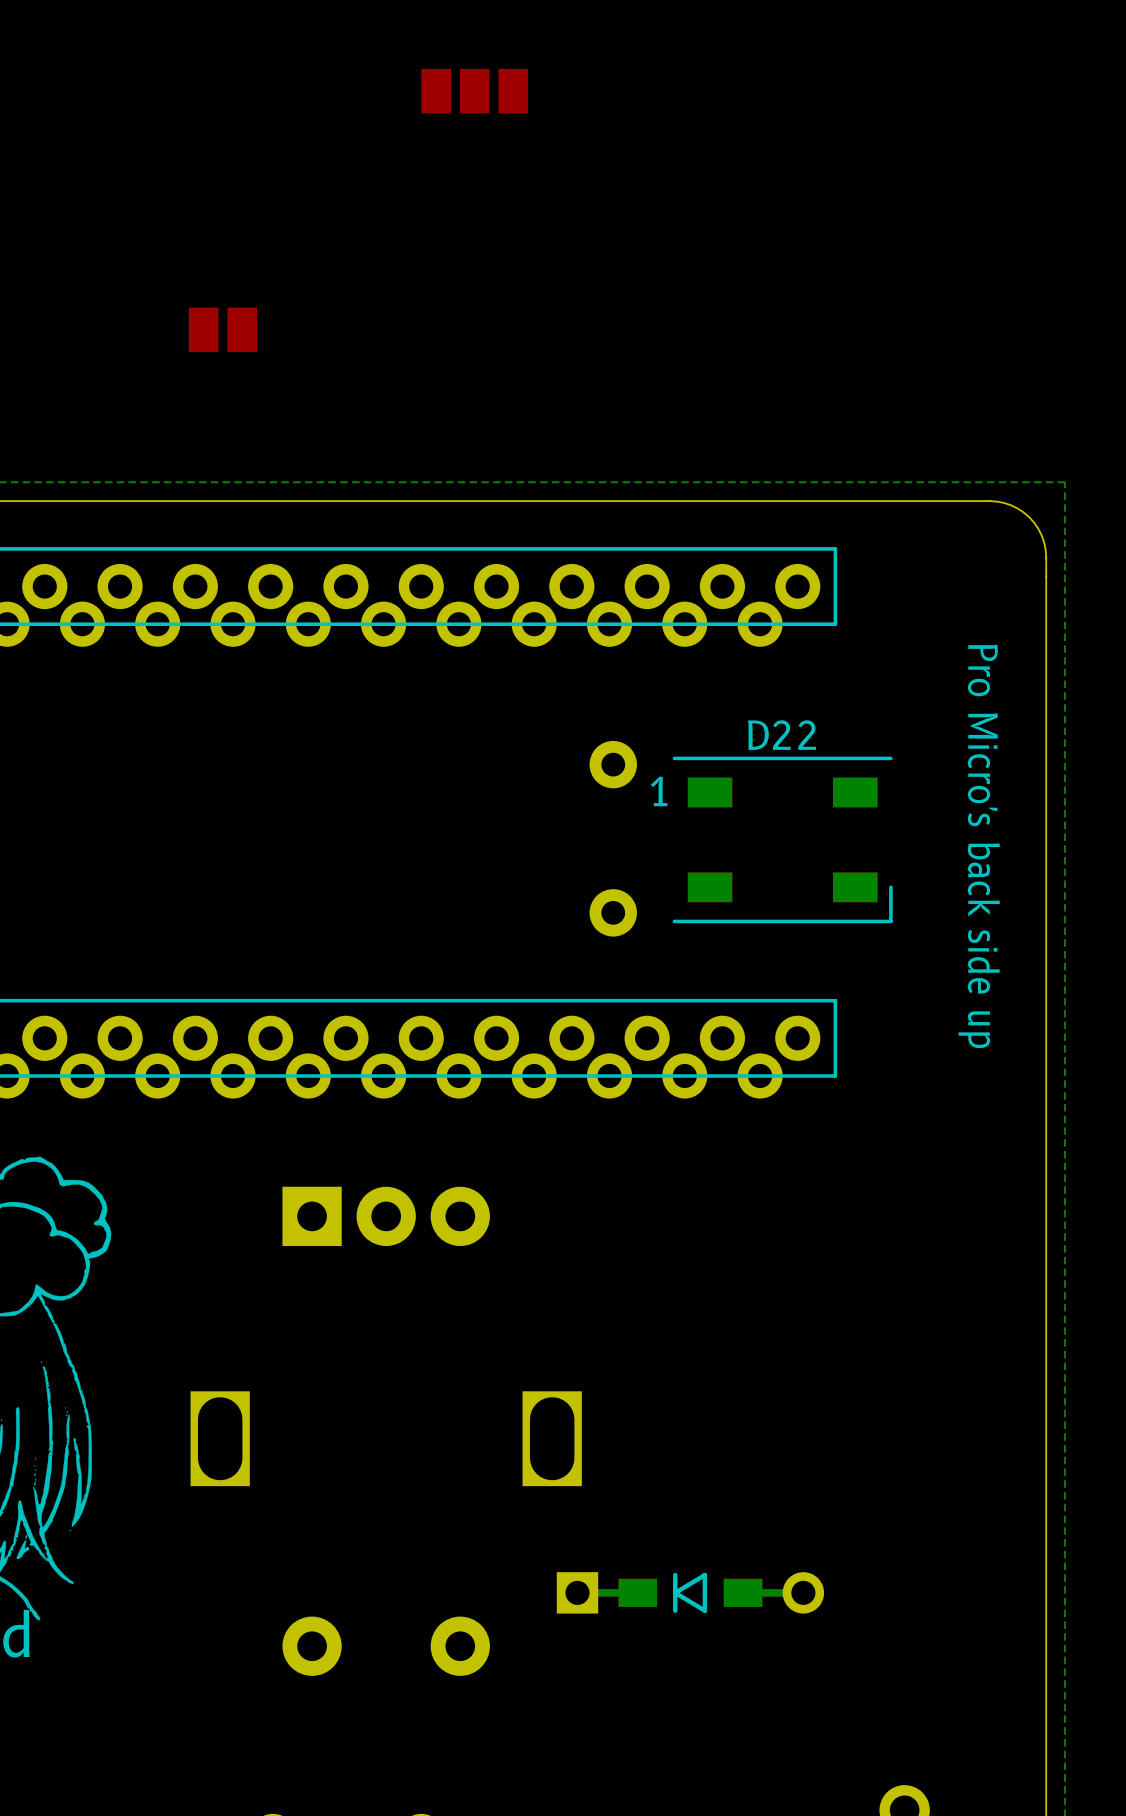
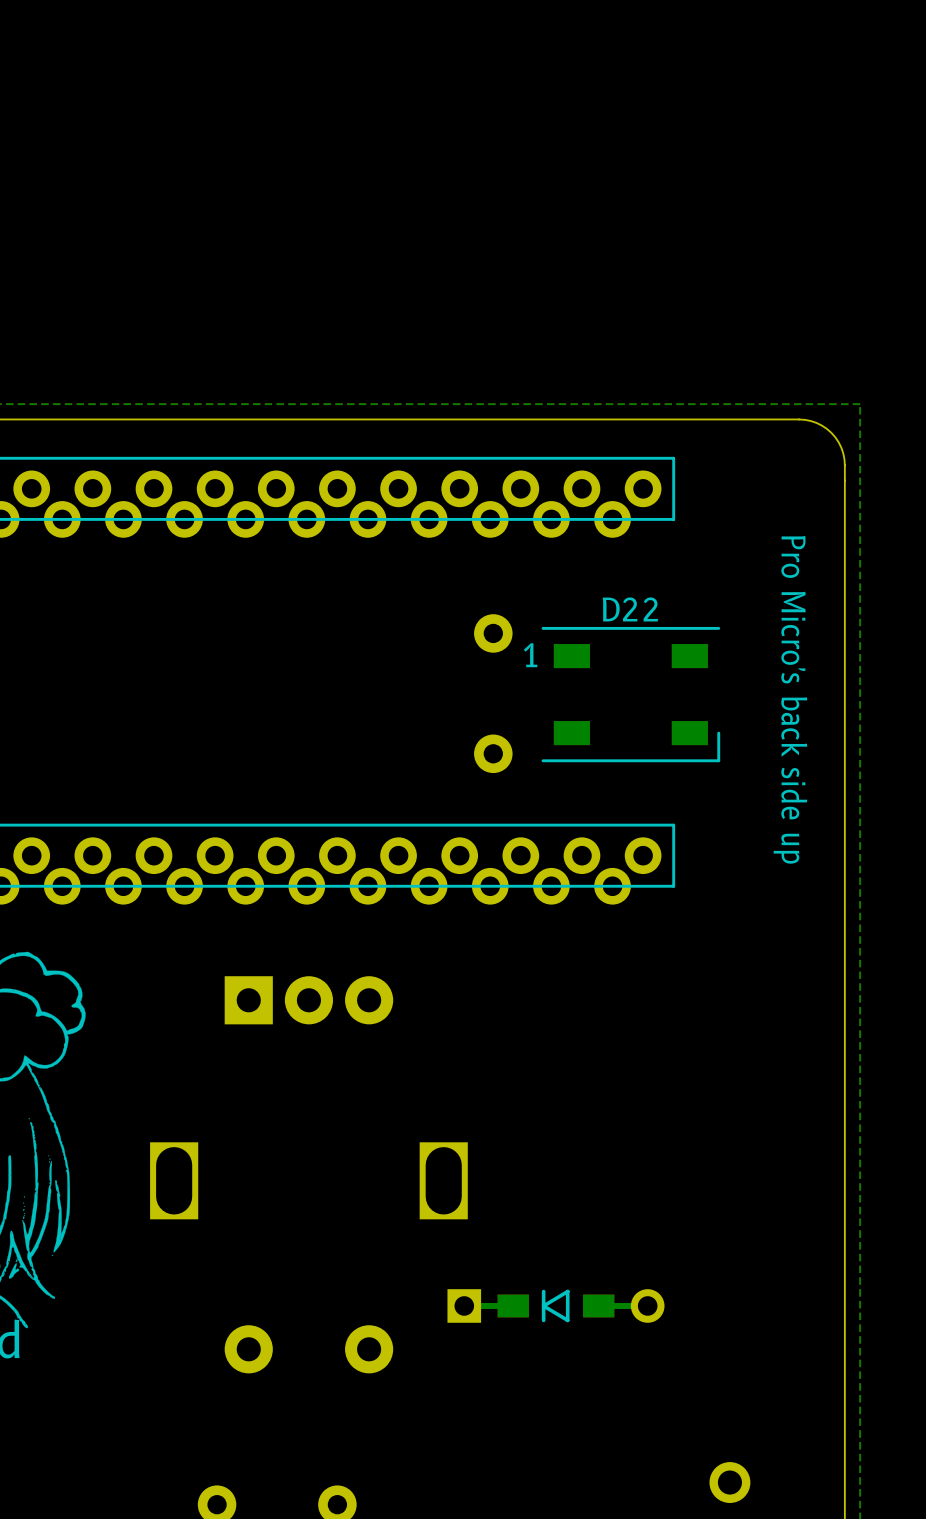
part: (474, 91) -> none
part: (222, 329) -> none

